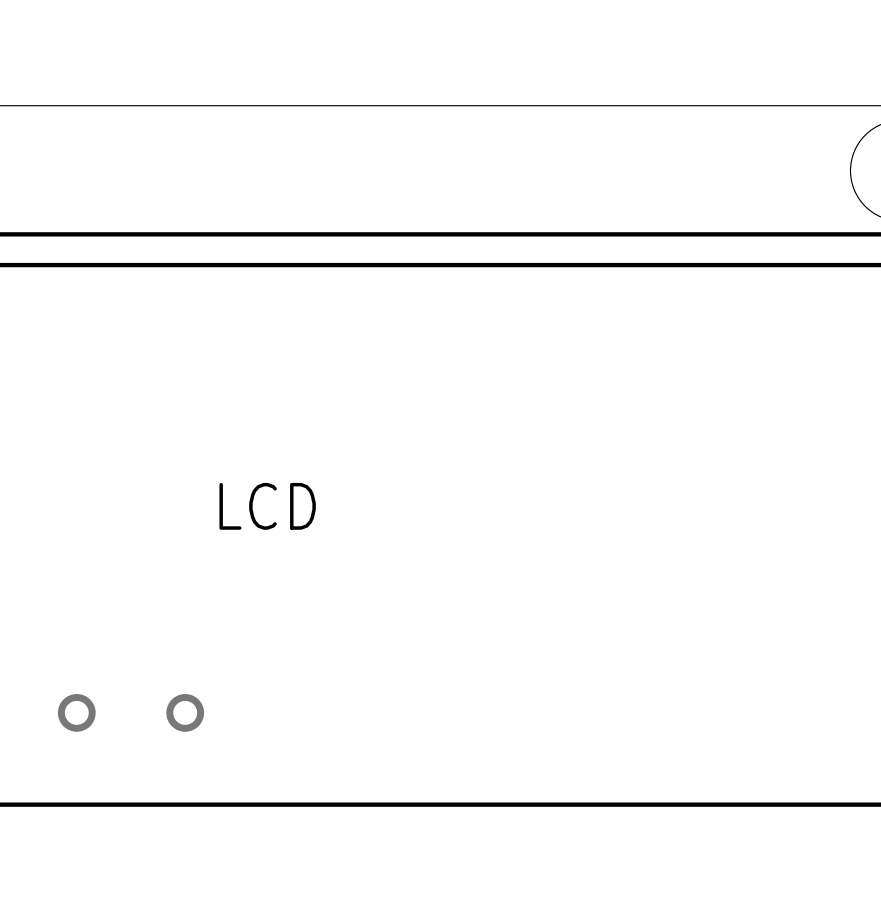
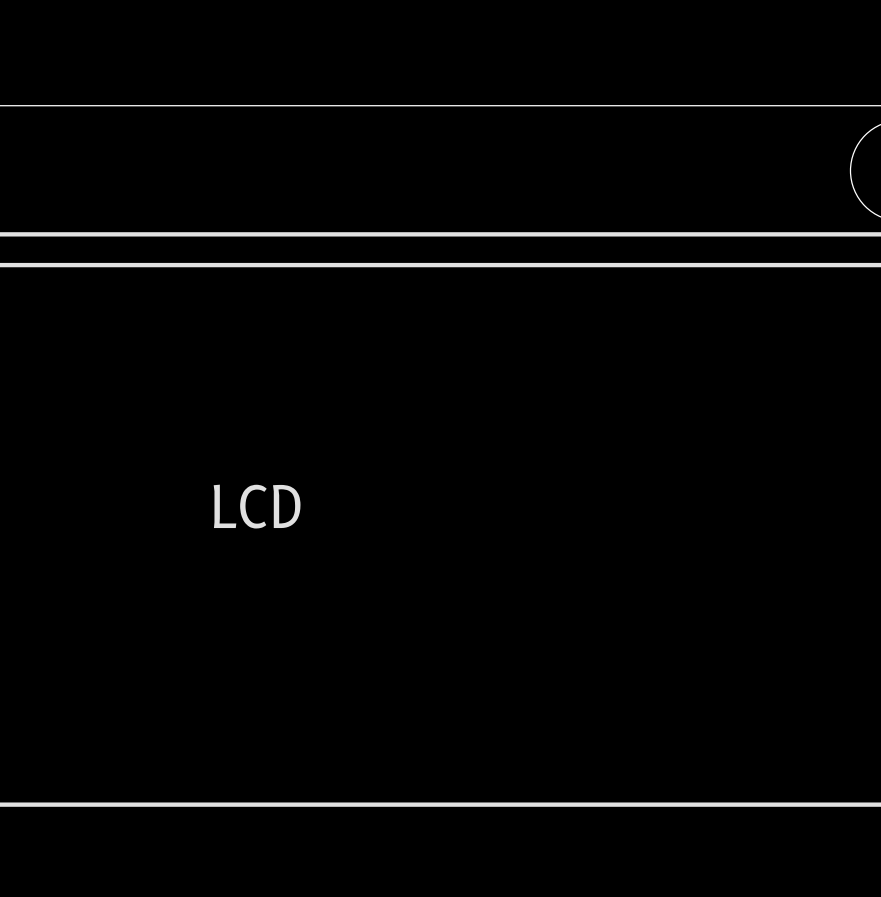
via: (76, 712) -> none
via: (185, 712) -> none

